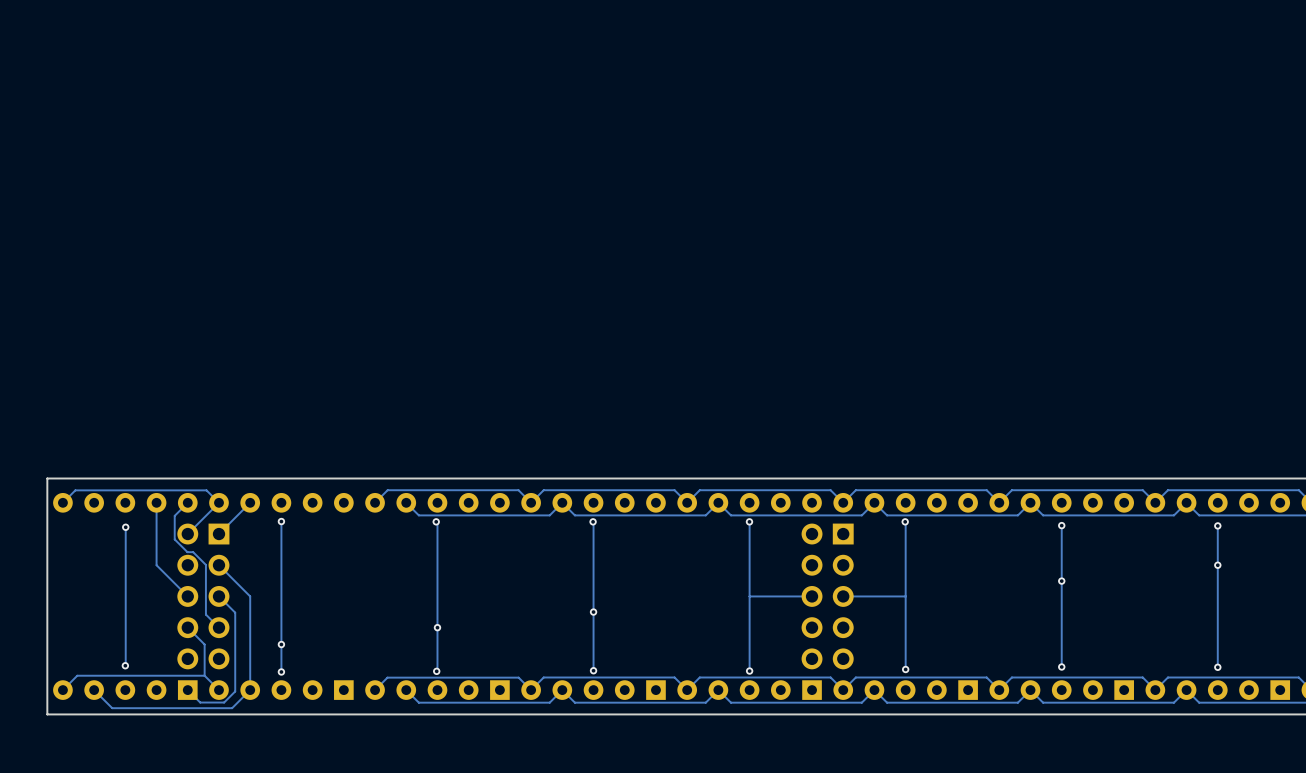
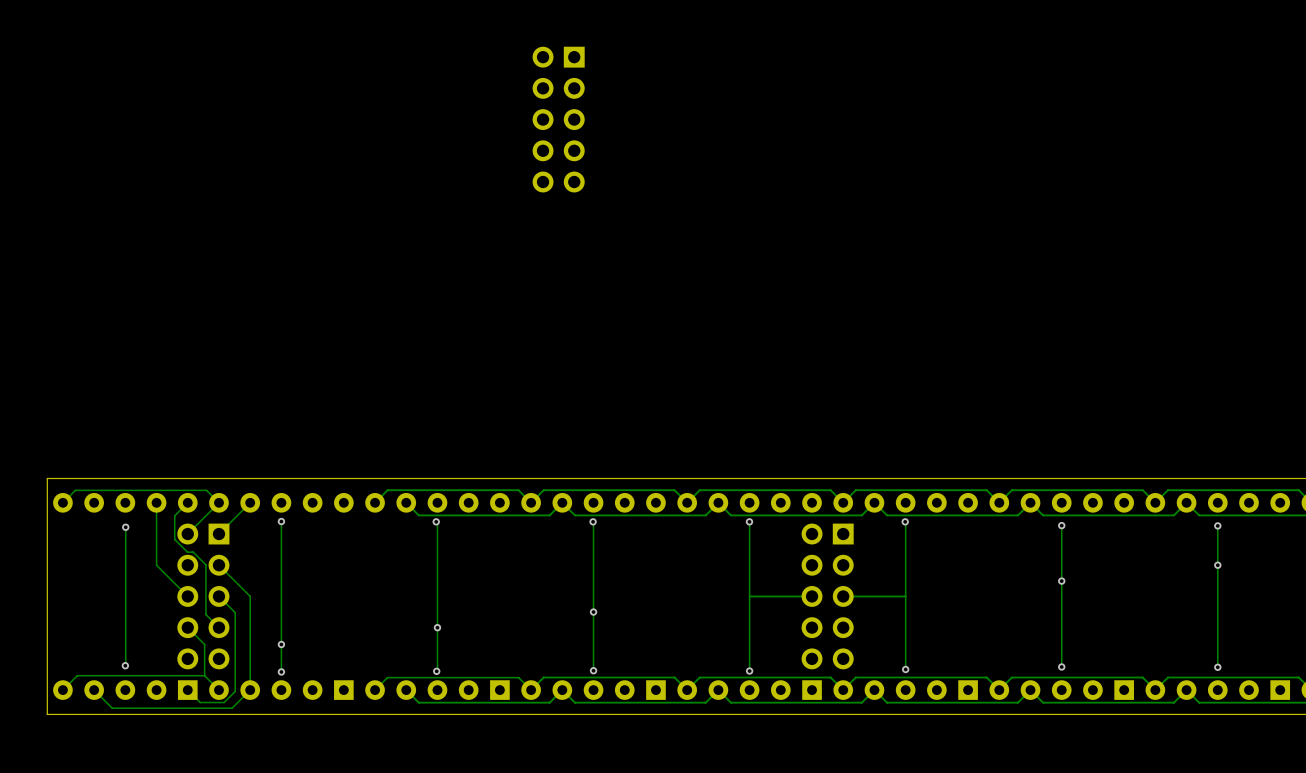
part: none -> (558, 119)

